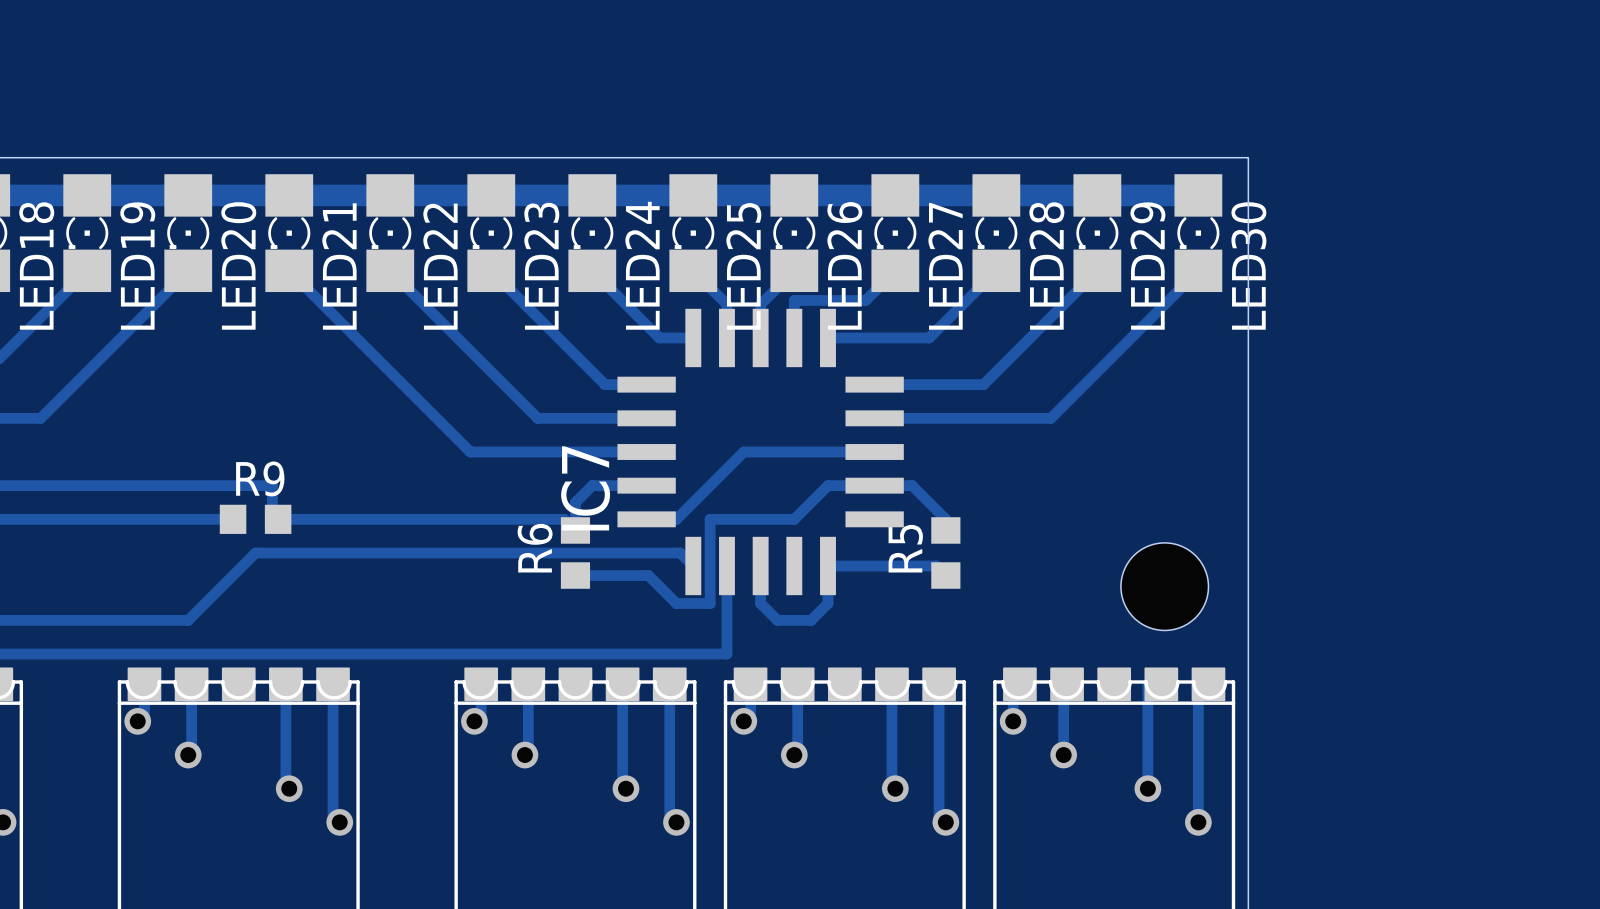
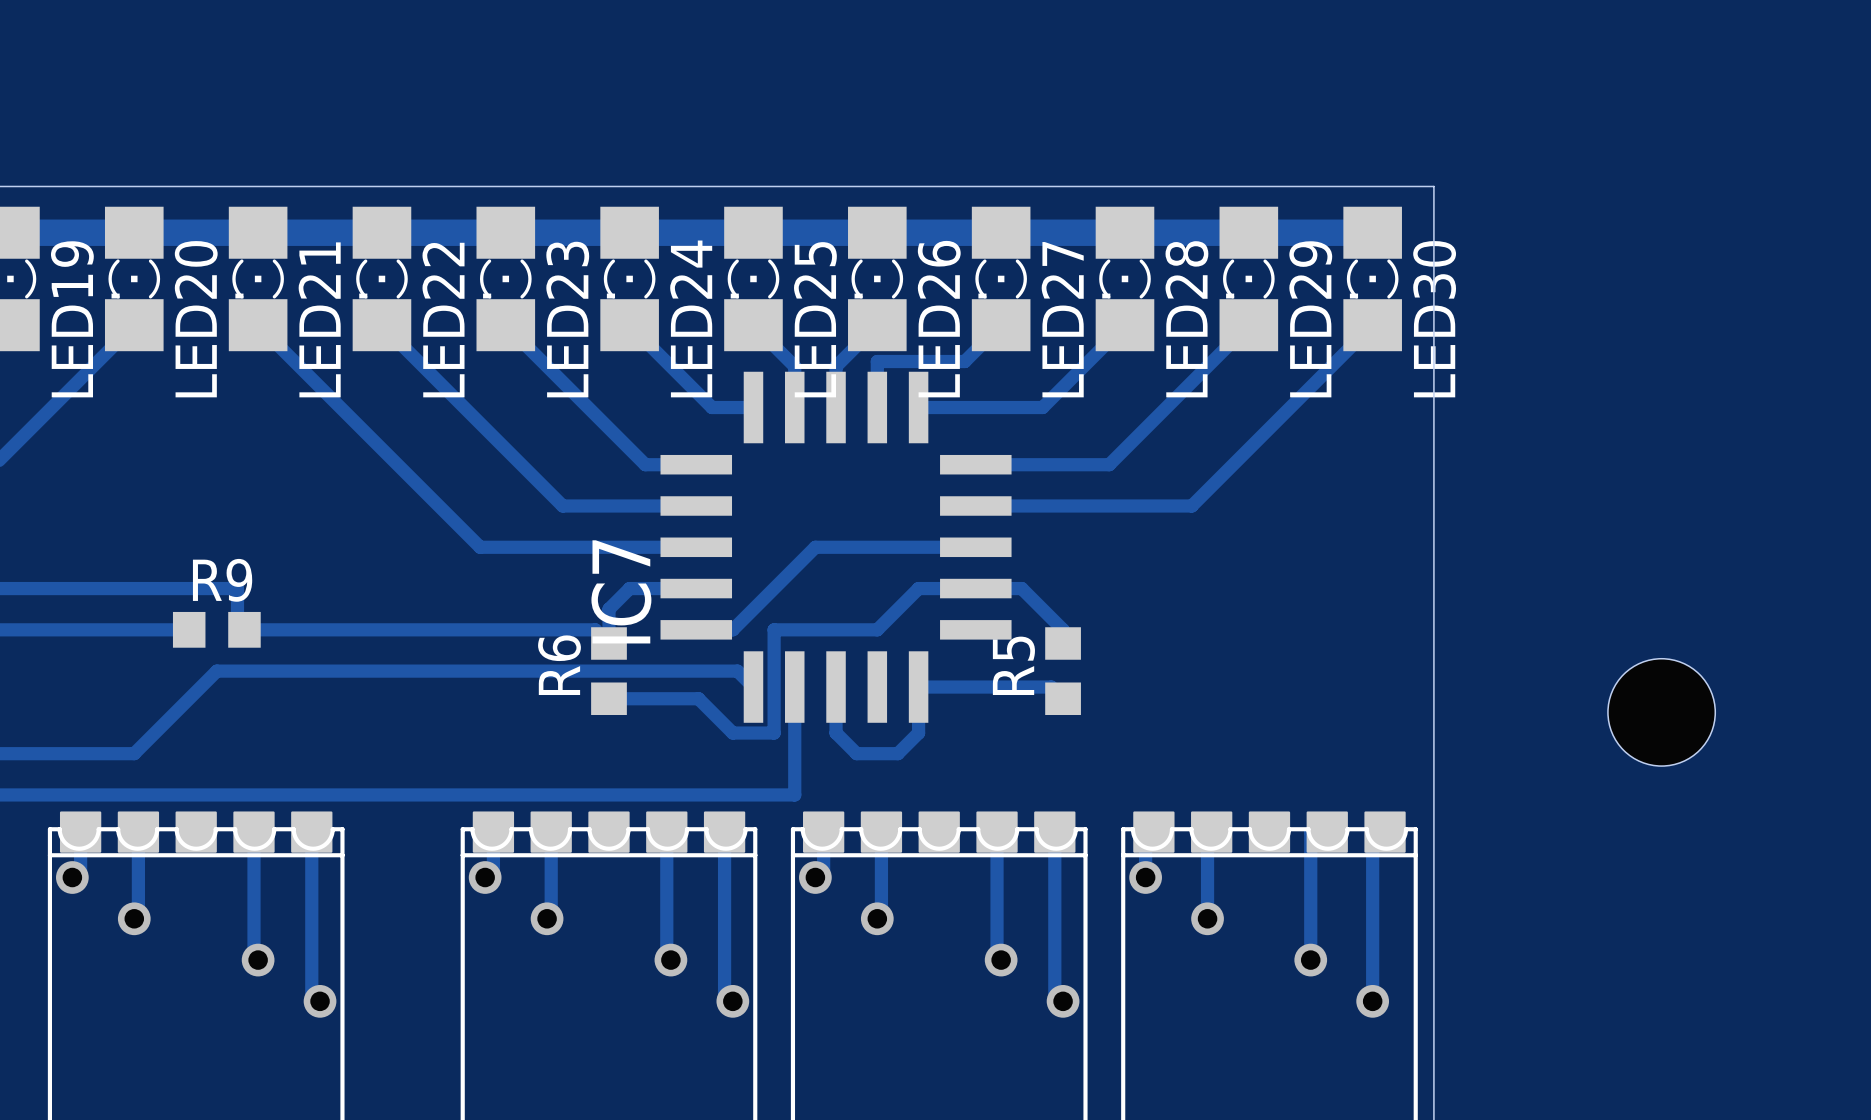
part position: (1164, 586) -> (1661, 712)

